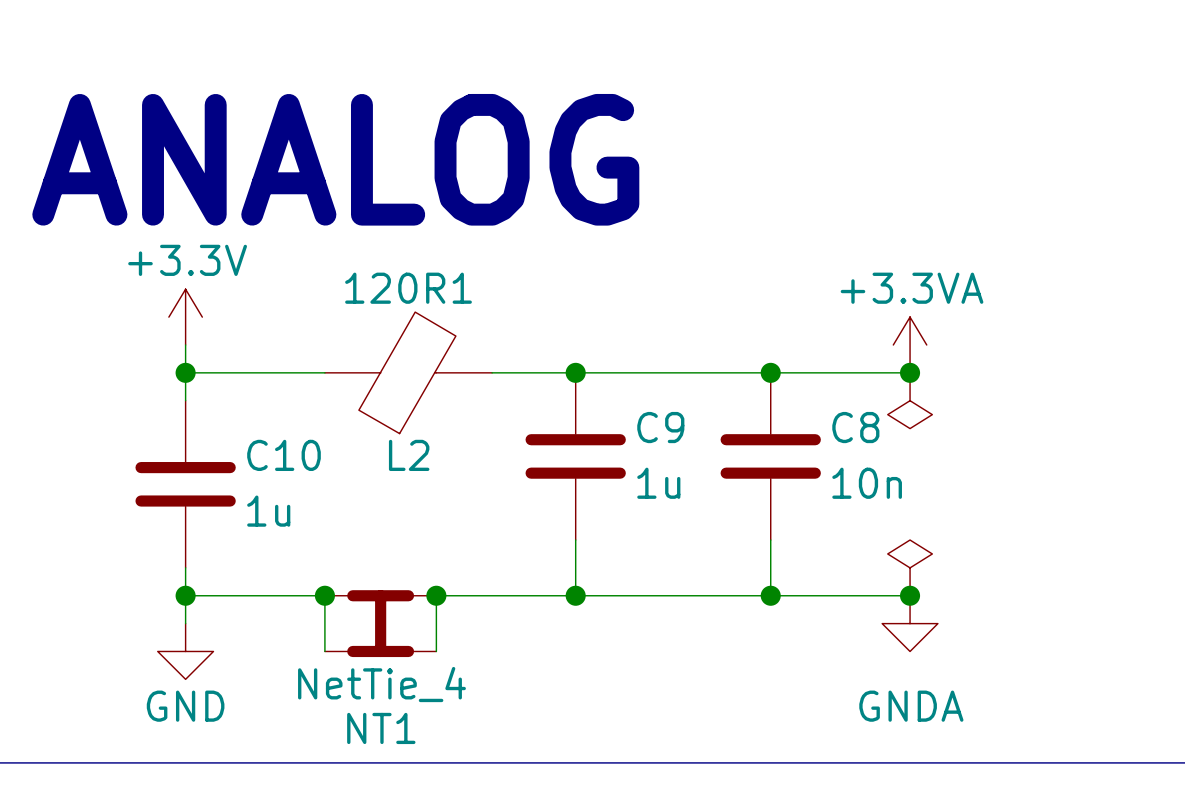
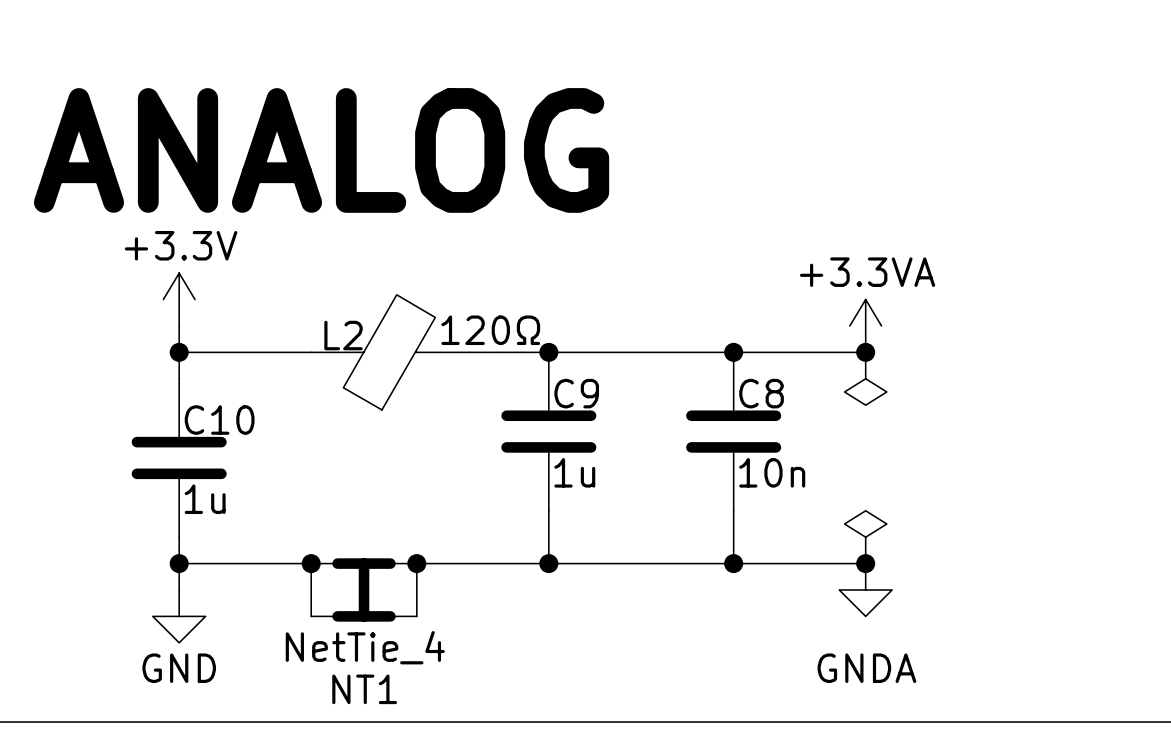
L2 value: 120R1 (408, 288) -> 120Ω (490, 330)
C9 name position: C9 (660, 427) -> C9 (576, 393)
C8 name position: C8 (855, 427) -> C8 (761, 393)
C10 name position: C10 (284, 455) -> C10 (219, 420)
L2 name position: L2 (409, 455) -> L2 (343, 335)
C9 value position: 1u (658, 483) -> 1u (574, 472)
C8 value position: 10n (867, 483) -> 10n (772, 472)
C10 value position: 1u (268, 511) -> 1u (205, 499)

